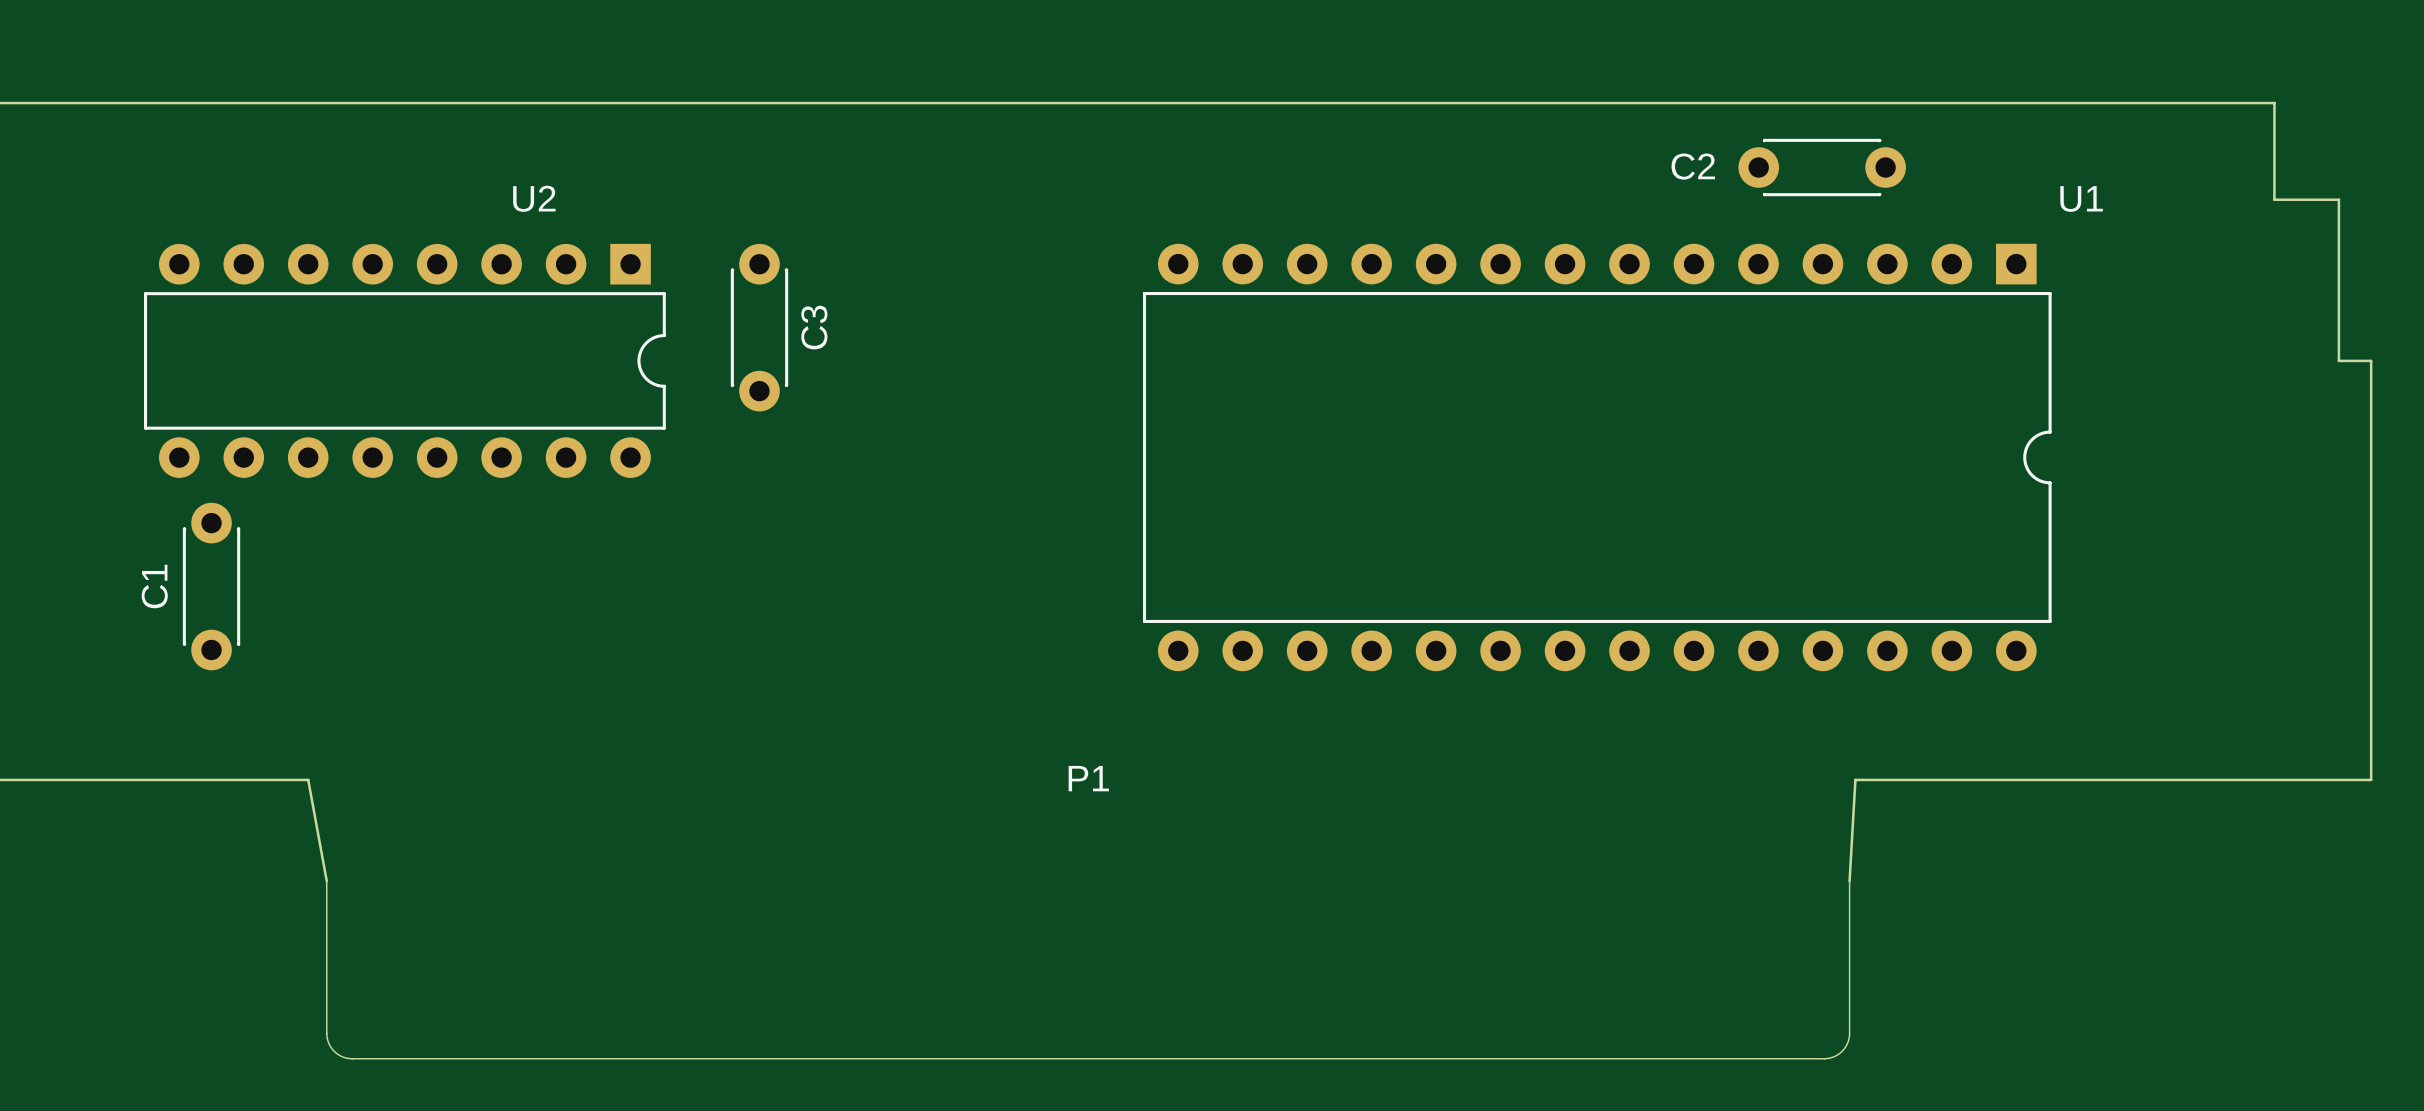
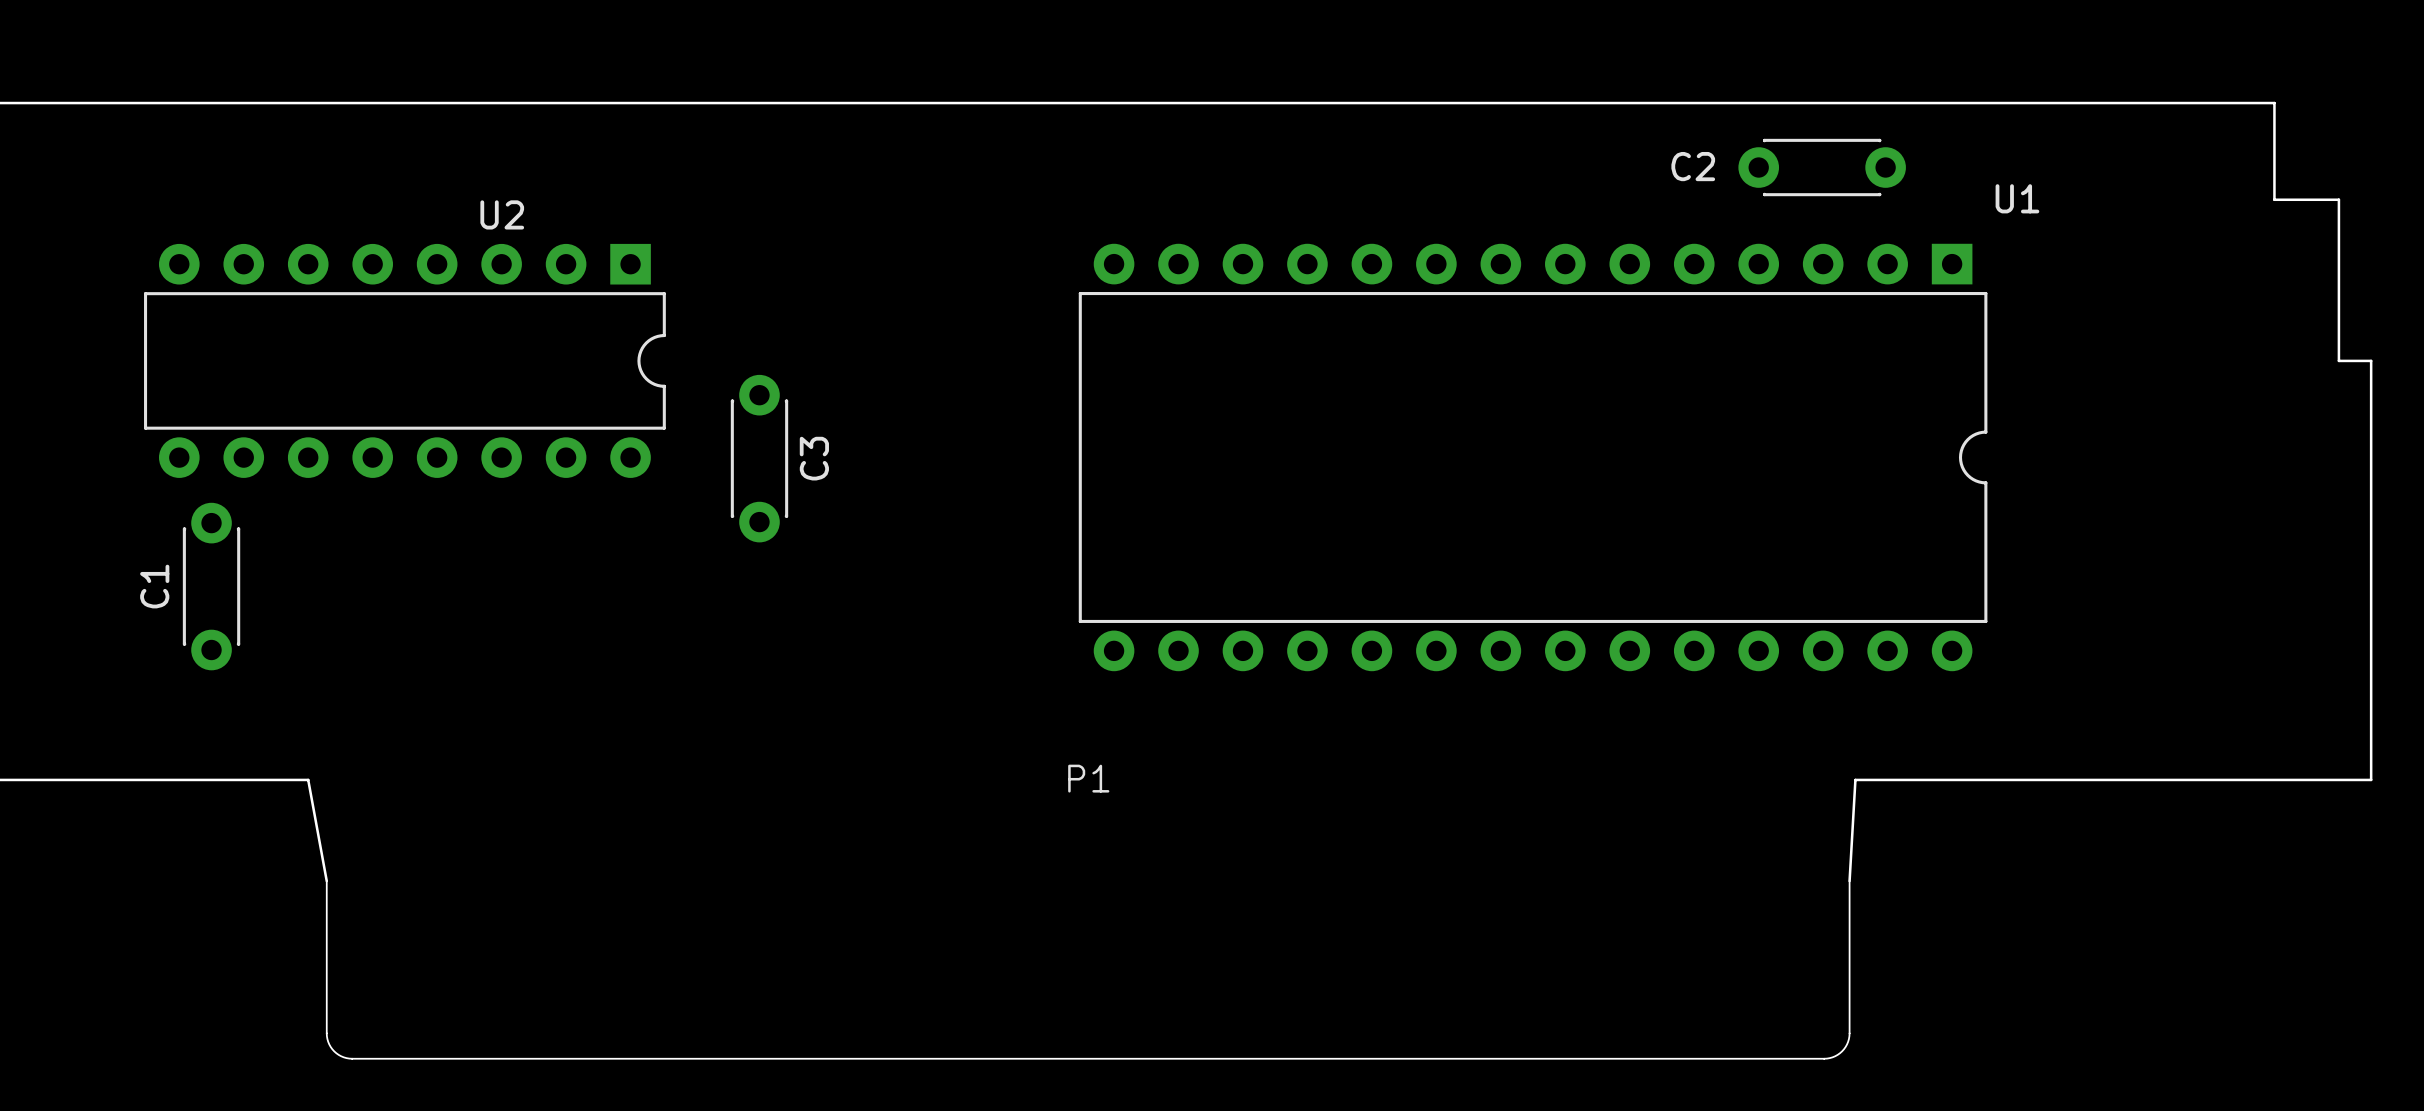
U2 name position: U2 (534, 198) -> U2 (502, 214)
C3 position: (759, 327) -> (759, 458)
U1 position: (1597, 457) -> (1533, 457)

